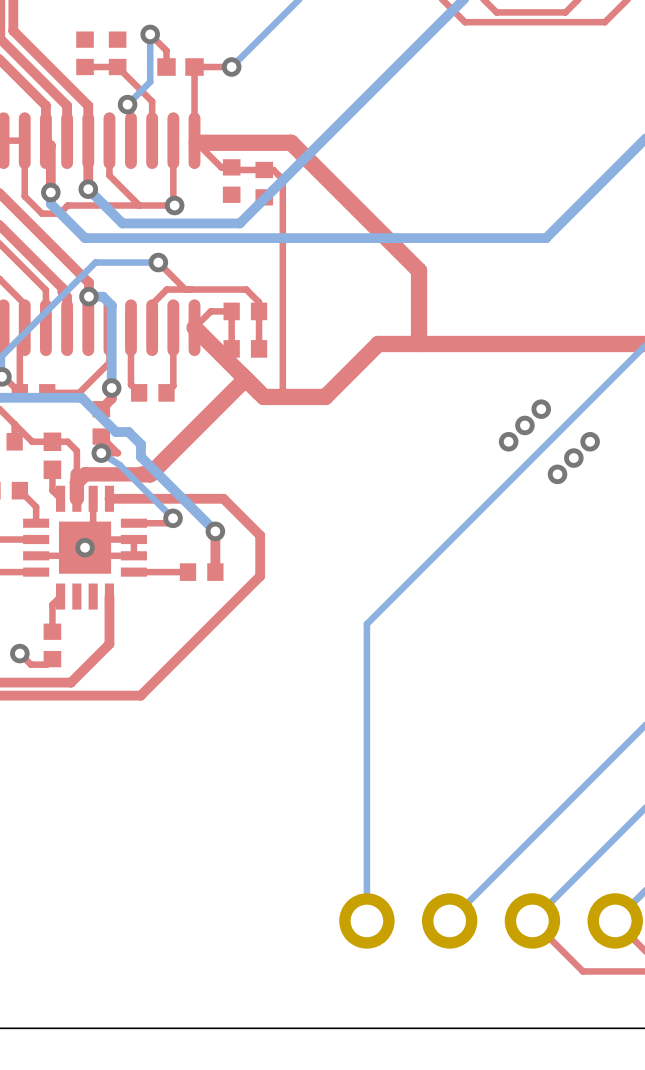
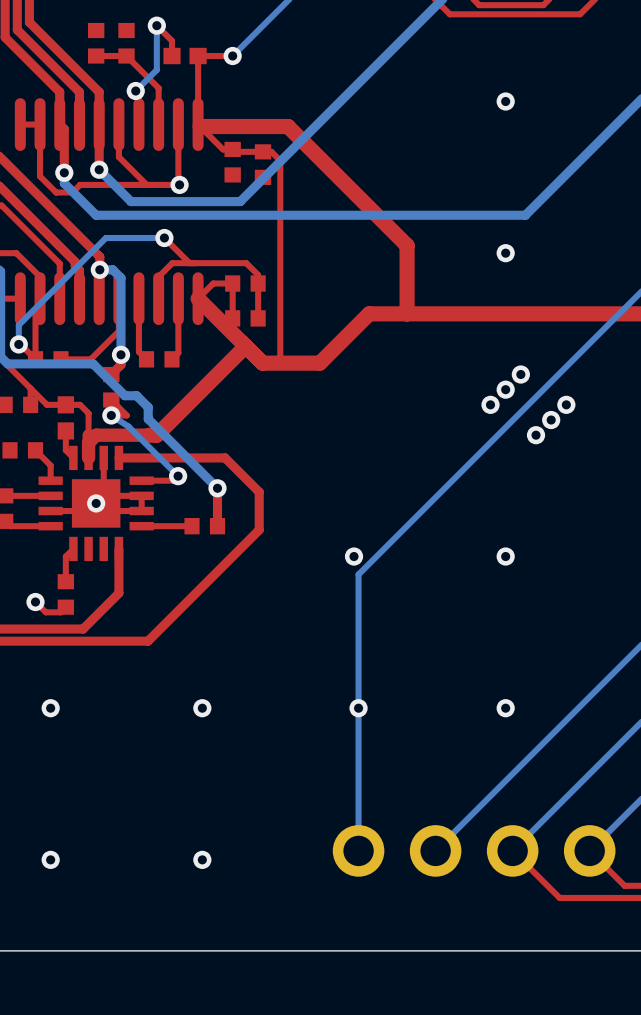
via: none -> (505, 101)
via: none -> (505, 253)
via: none -> (354, 556)
via: none -> (505, 556)
via: none -> (50, 708)
via: none -> (202, 708)
via: none -> (358, 708)
via: none -> (505, 708)
via: none -> (50, 859)
via: none -> (202, 859)

